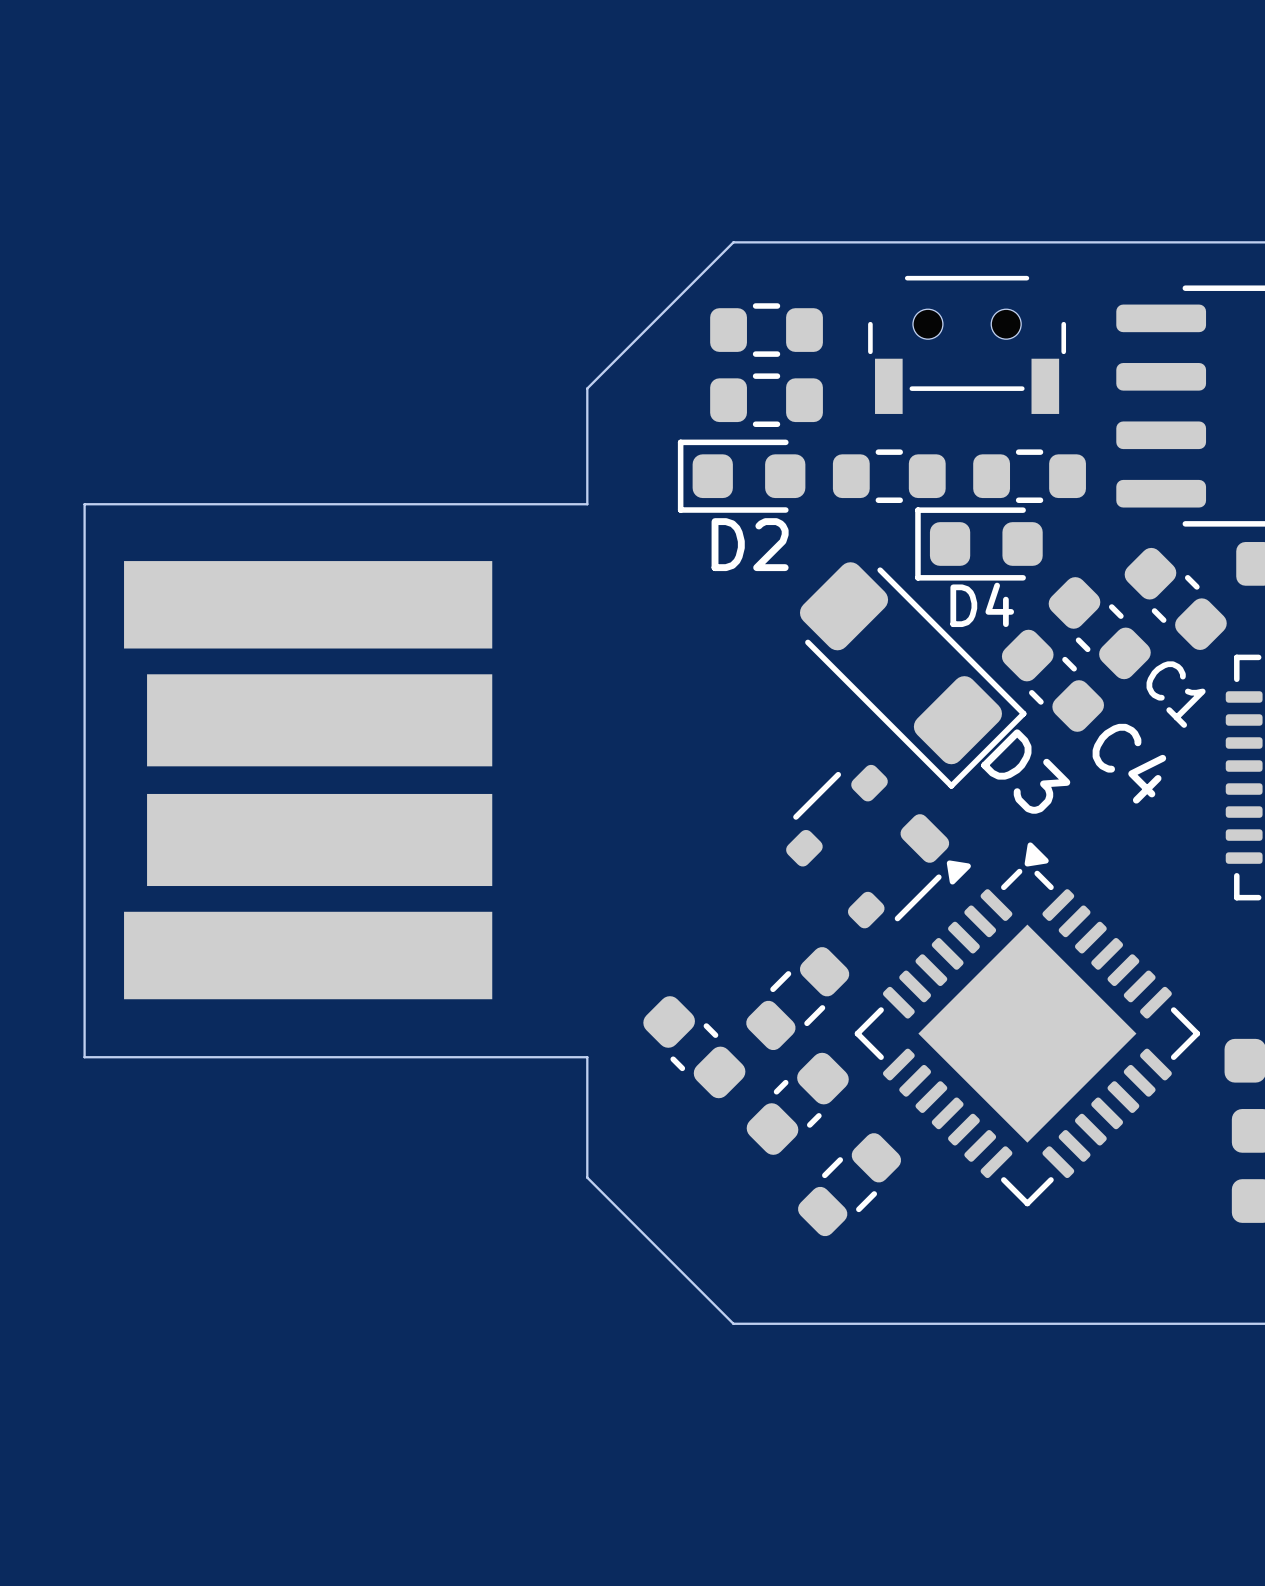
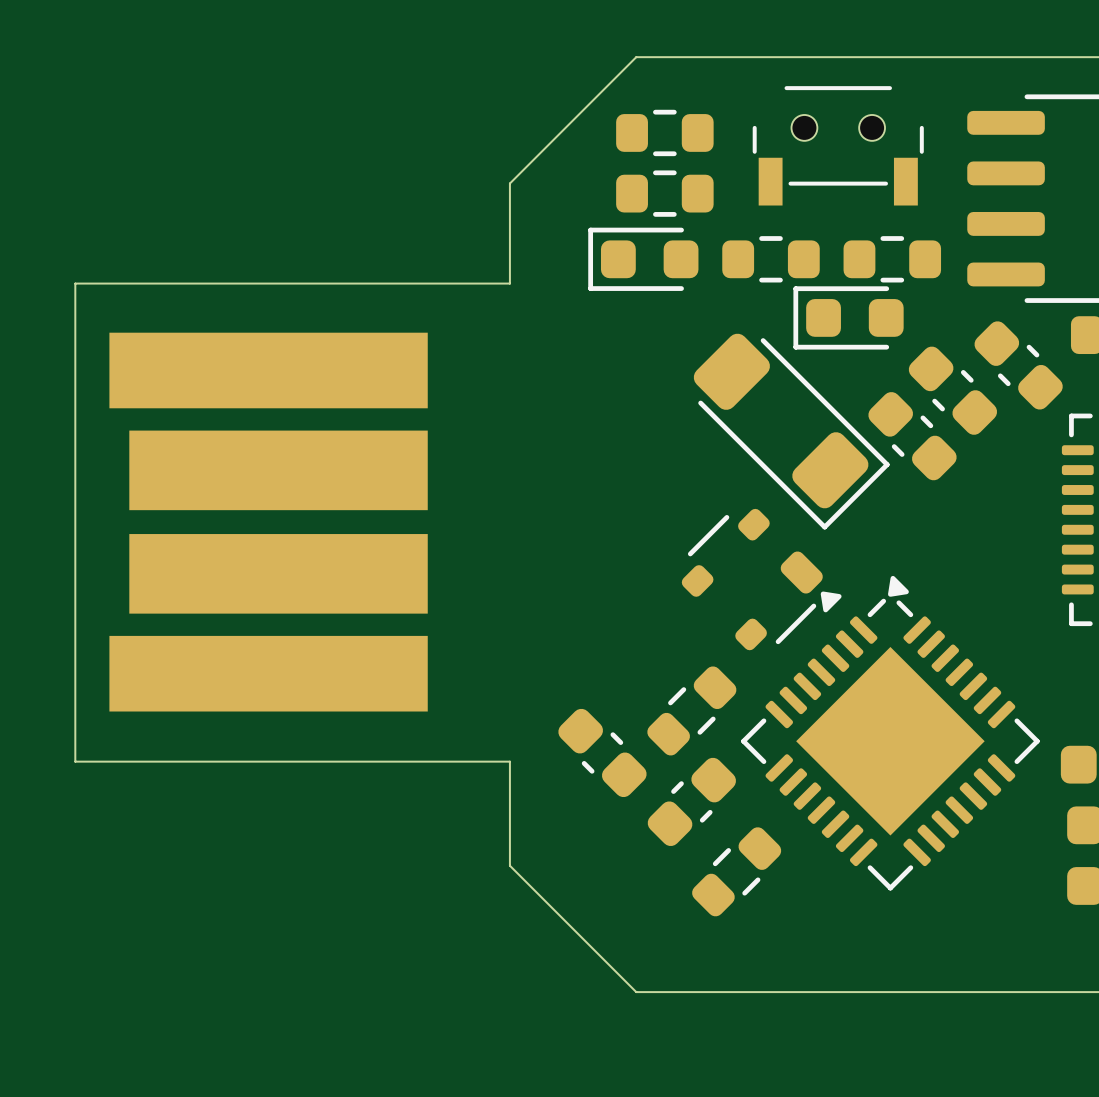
D2 name: D2 (750, 544) -> none
D4 name: D4 (982, 604) -> none
C1 name: C1 (1176, 694) -> none
C4 name: C4 (1129, 763) -> none
D3 name: D3 (1025, 771) -> none

